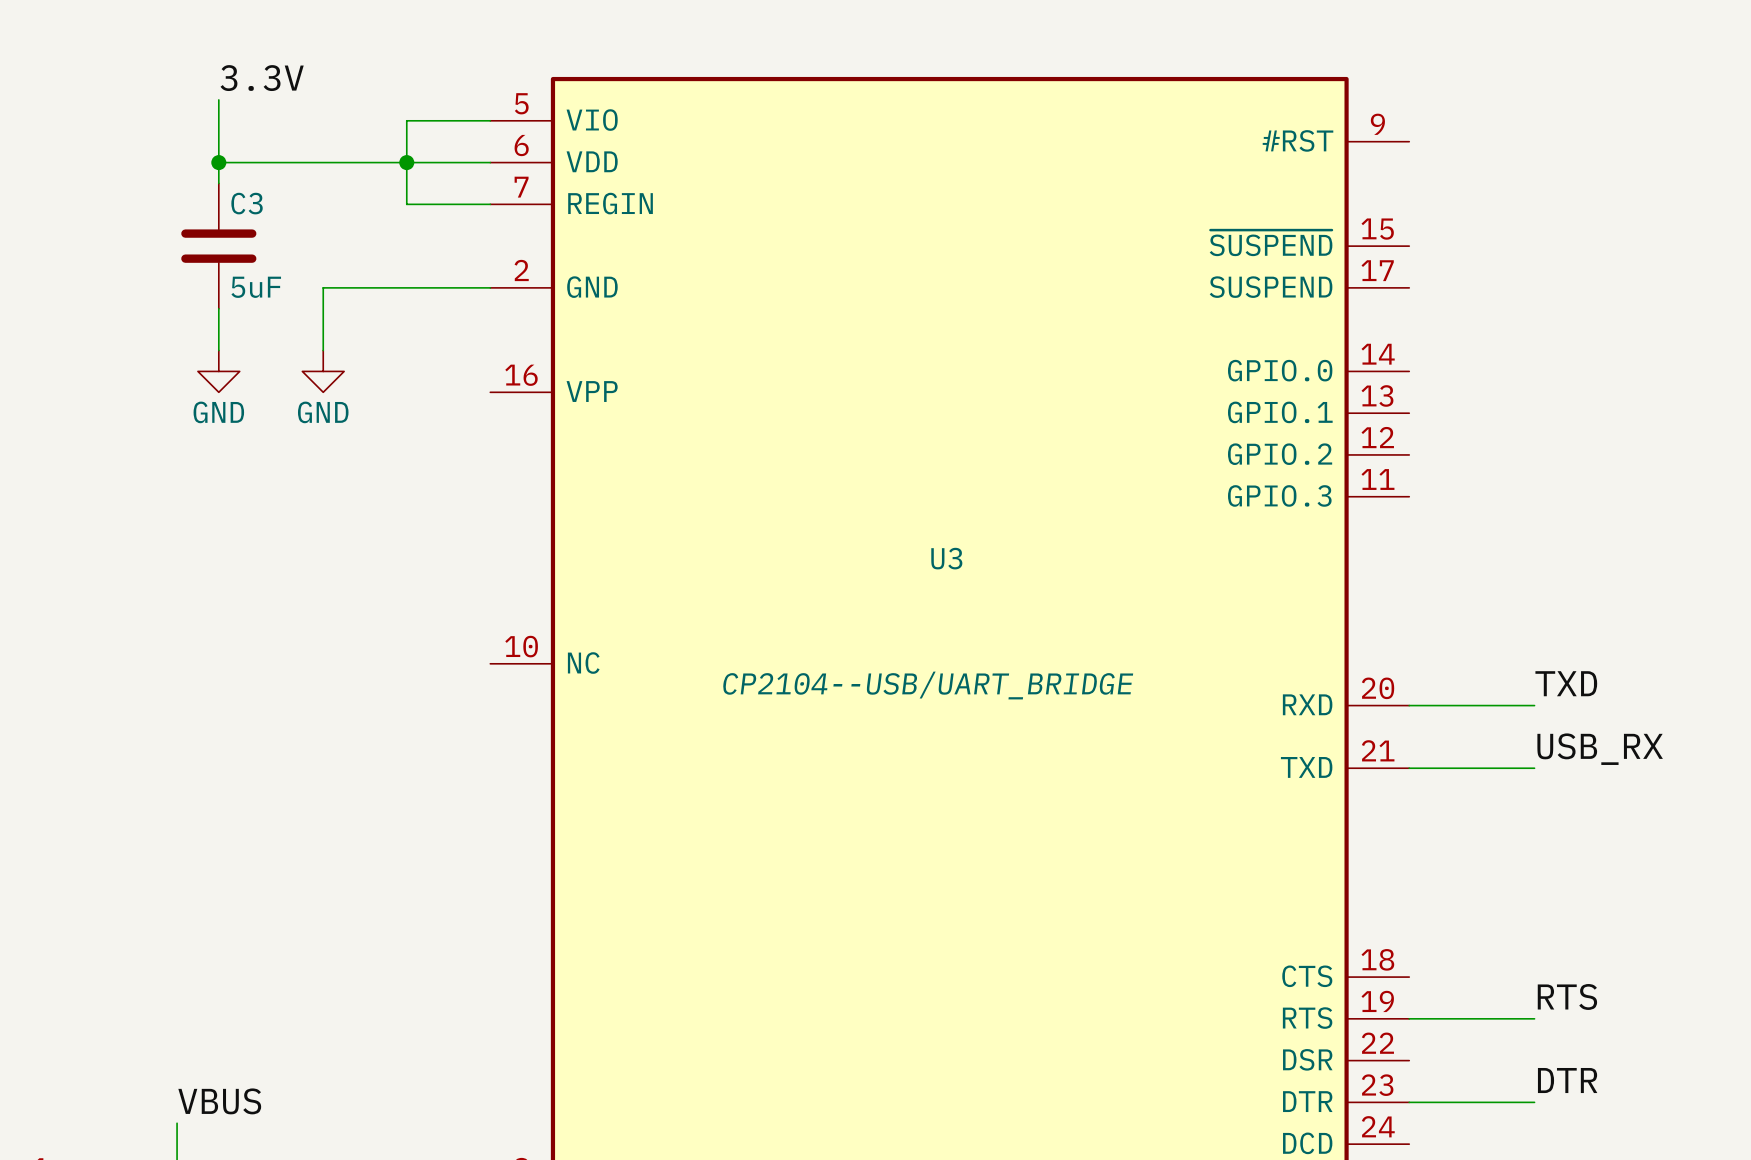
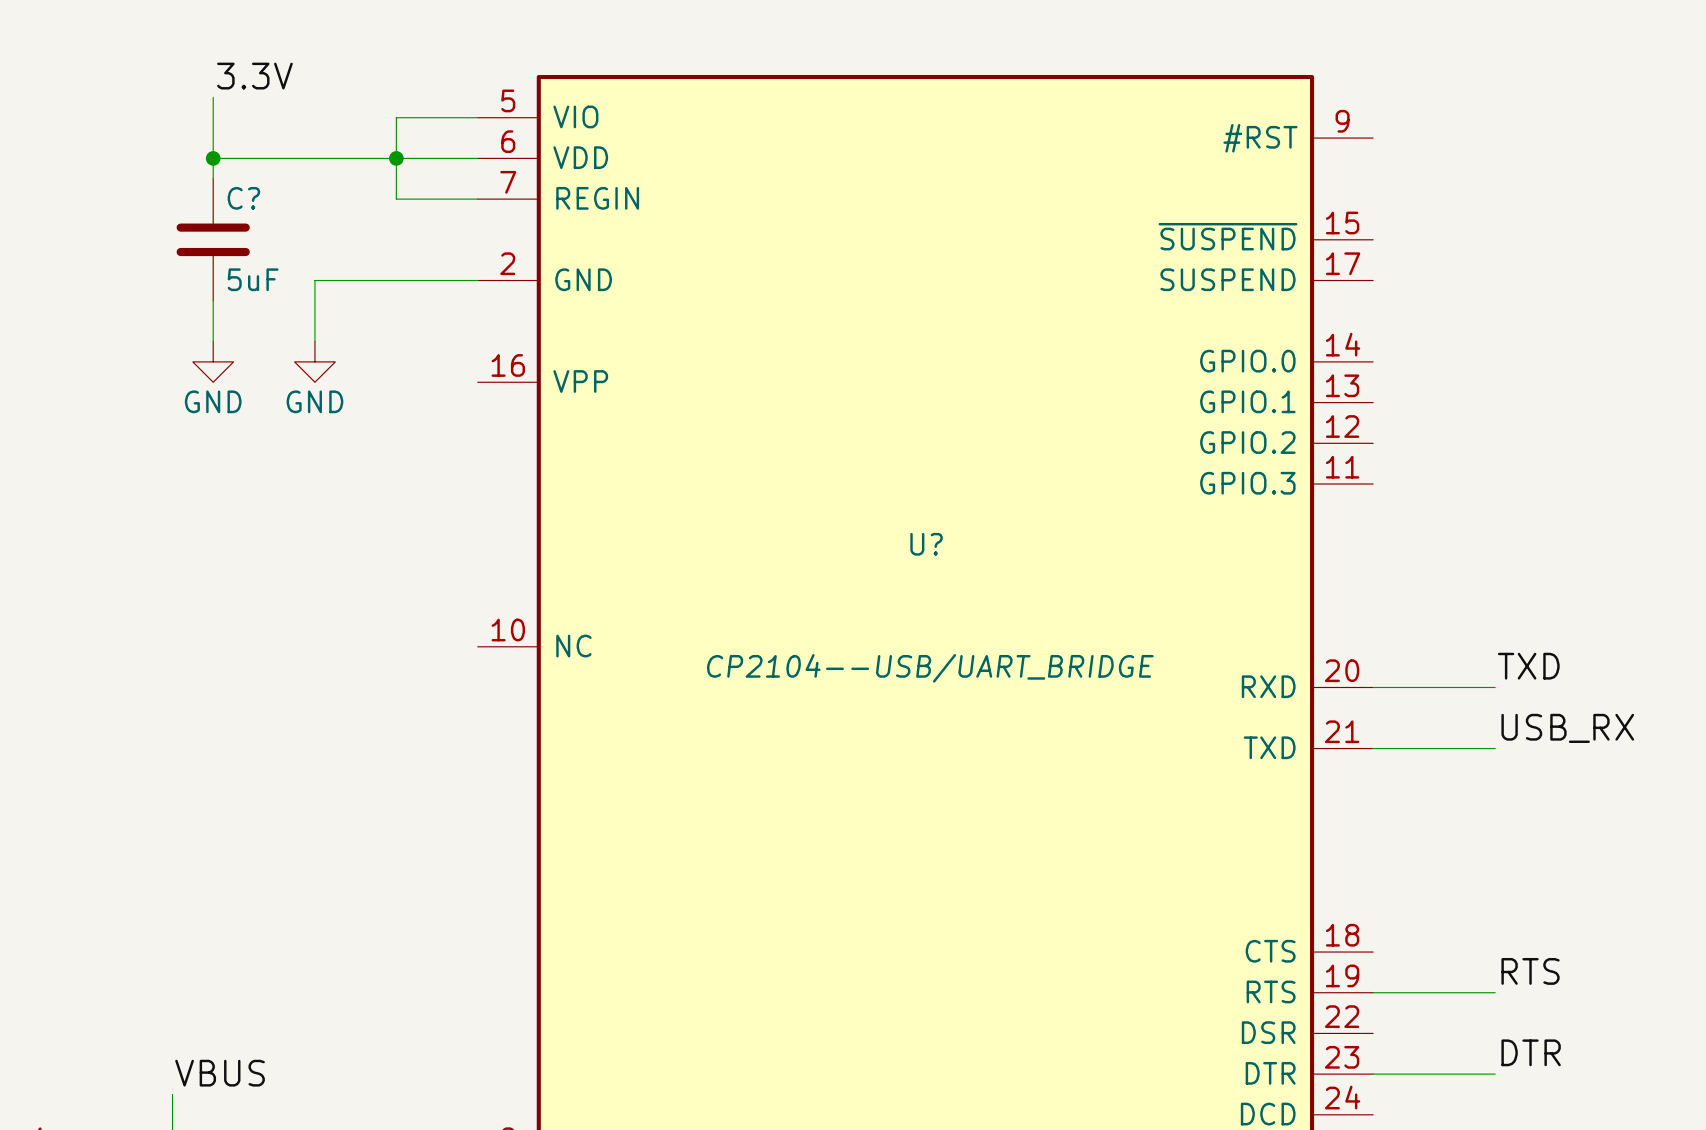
C3 name: C3 (247, 203) -> C? (243, 198)
U3 name: U3 (946, 558) -> U? (926, 544)

